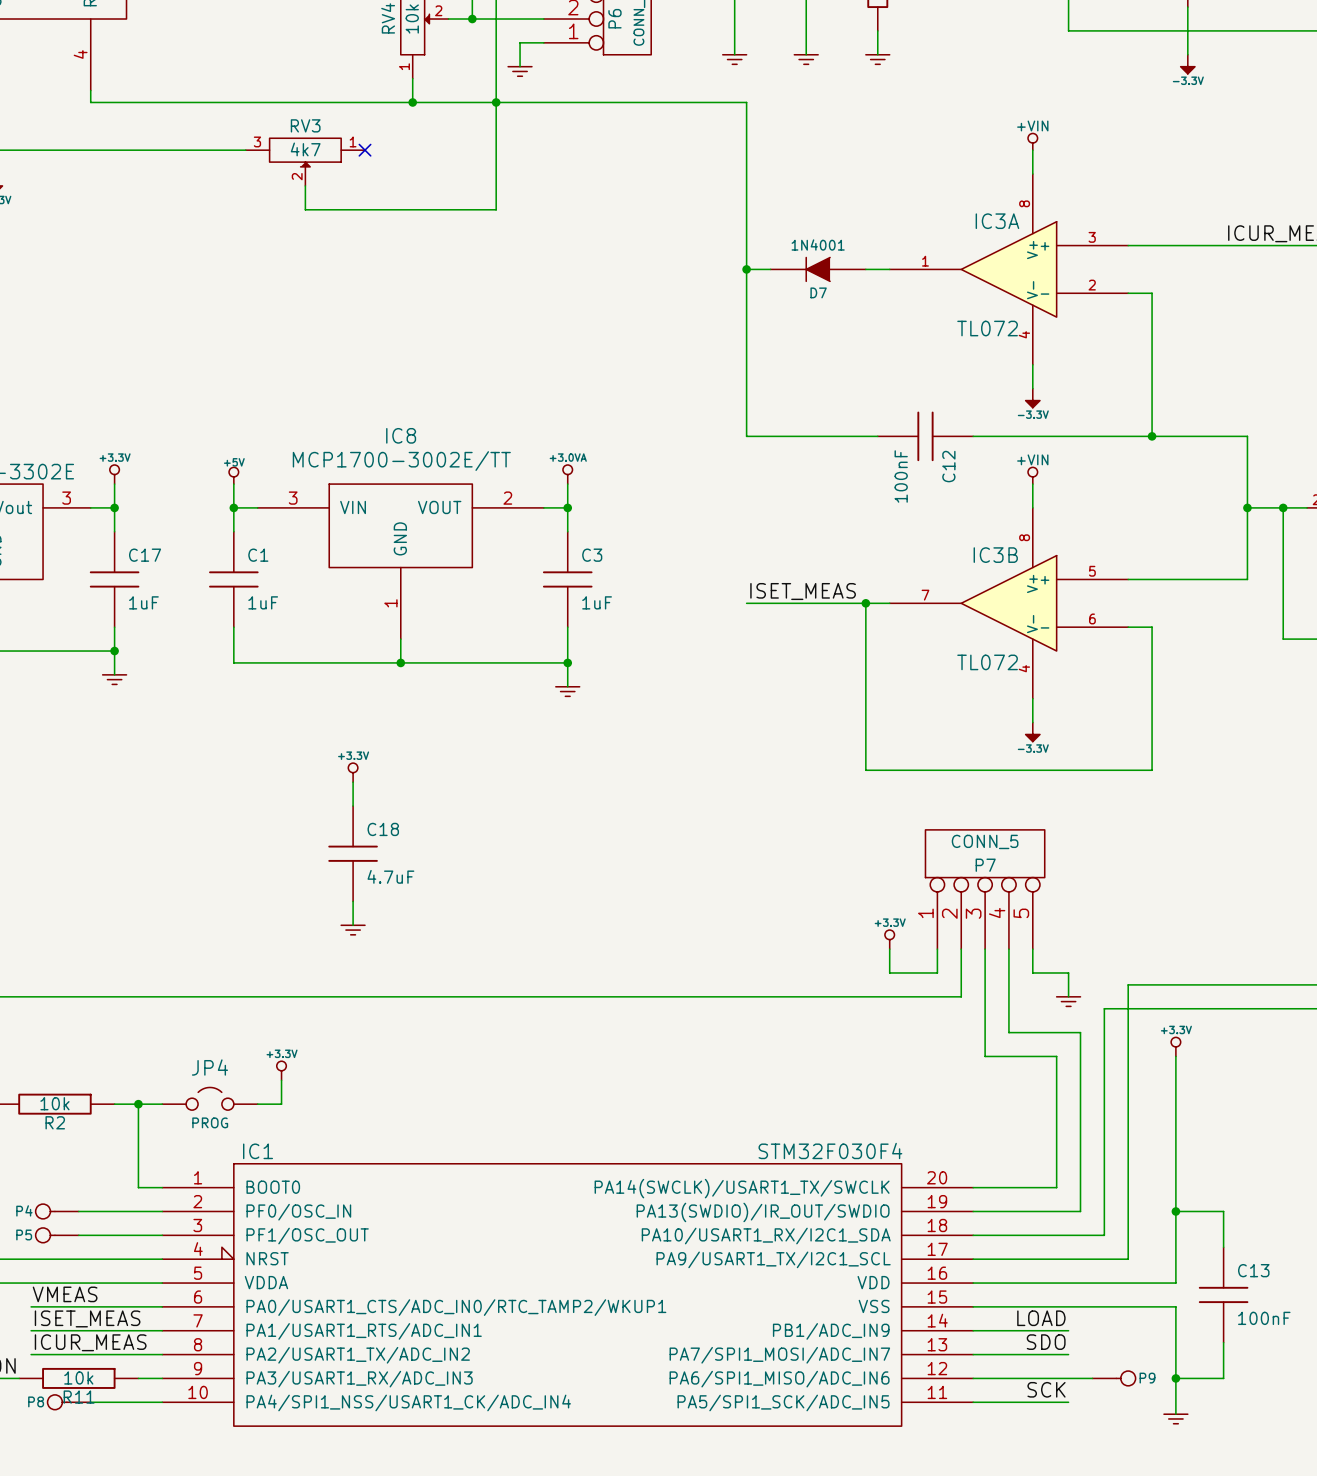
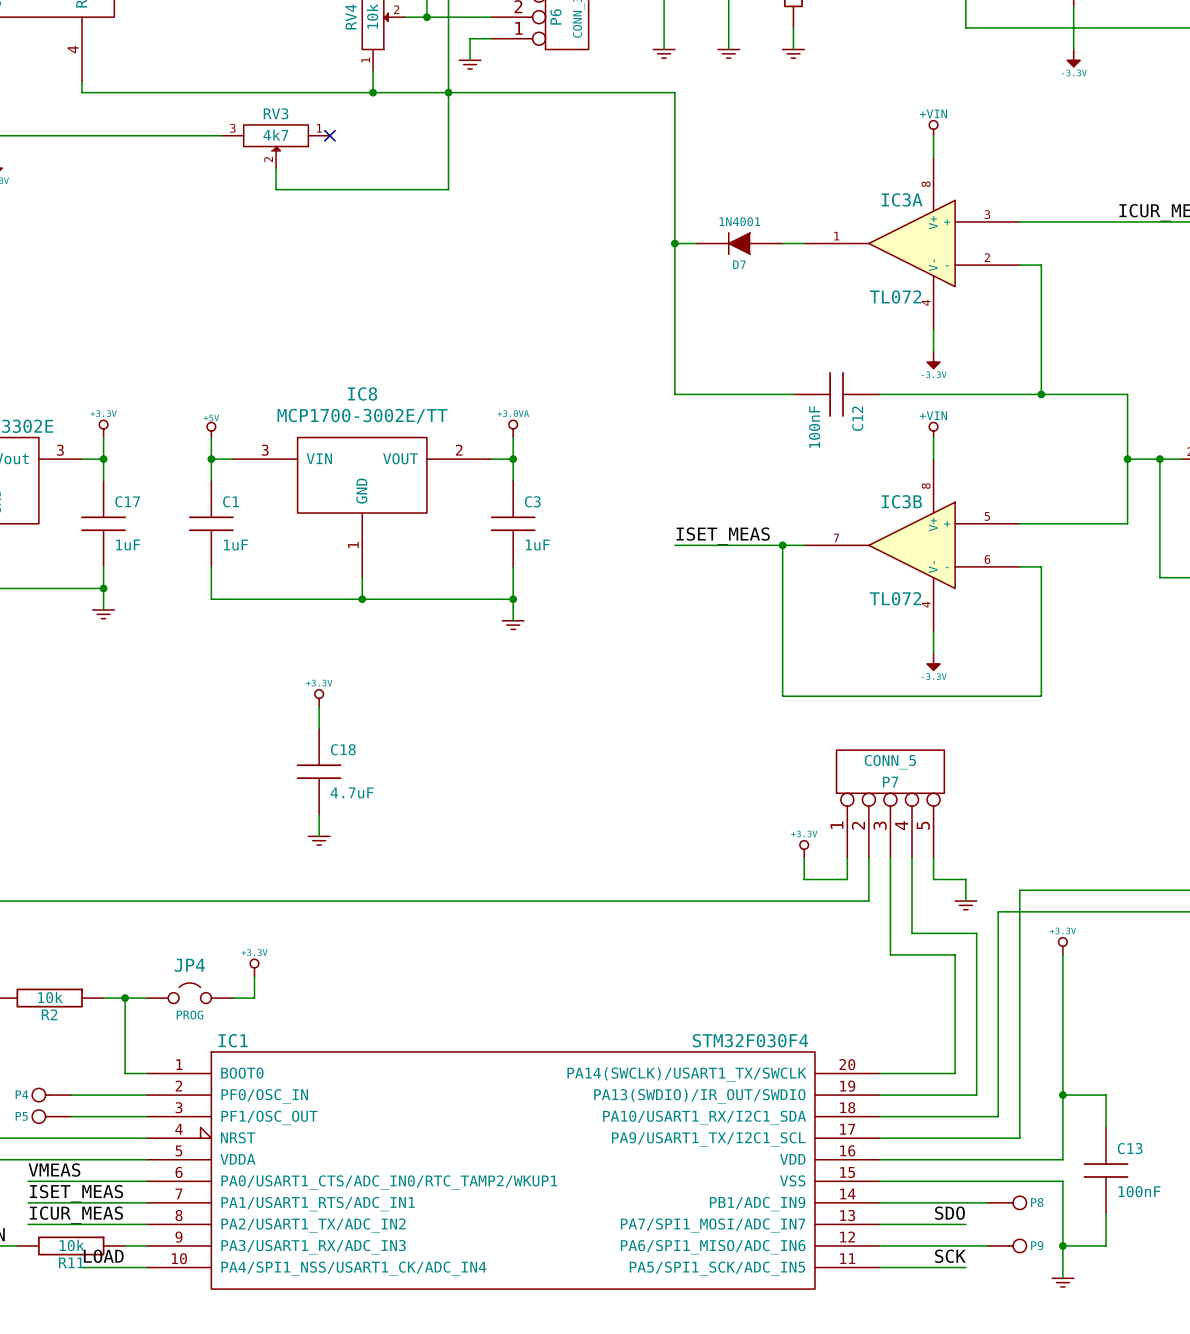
label: LOAD (1041, 1318) -> none
wire: none -> (965, 1202) (987, 1202)
label: none -> LOAD (103, 1256)
P8 rotation: 0° (57, 1402) -> 180° (1017, 1202)
P8 position: (69, 1402) -> (1006, 1202)

